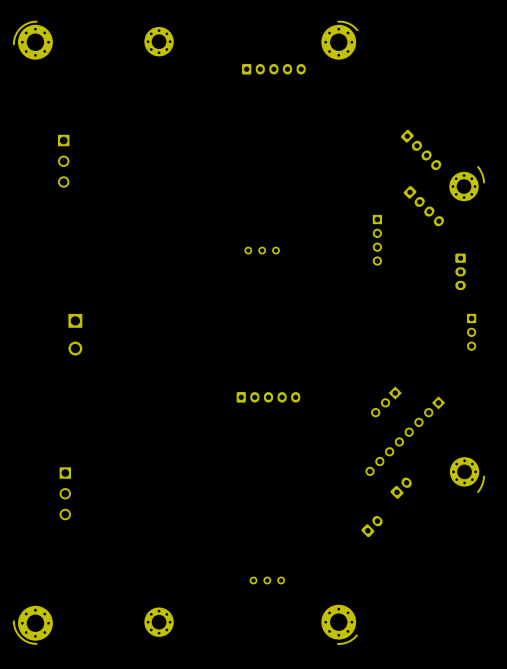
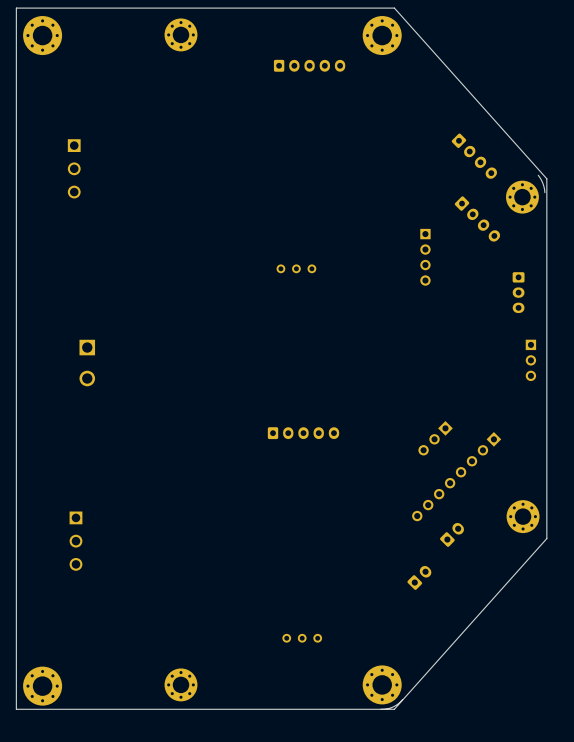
board edge: none -> (394, 8) (16, 8) (16, 709) (394, 709) (546, 538) (546, 178) (394, 8)
board edge: (36, 21) (29, 22) (20, 28) (15, 36) (13, 44) -> none
board edge: (338, 21) (348, 23) (357, 30) -> none
board edge: (484, 476) (478, 492) -> none
board edge: (13, 621) (15, 628) (20, 637) (29, 642) (36, 643) -> none

